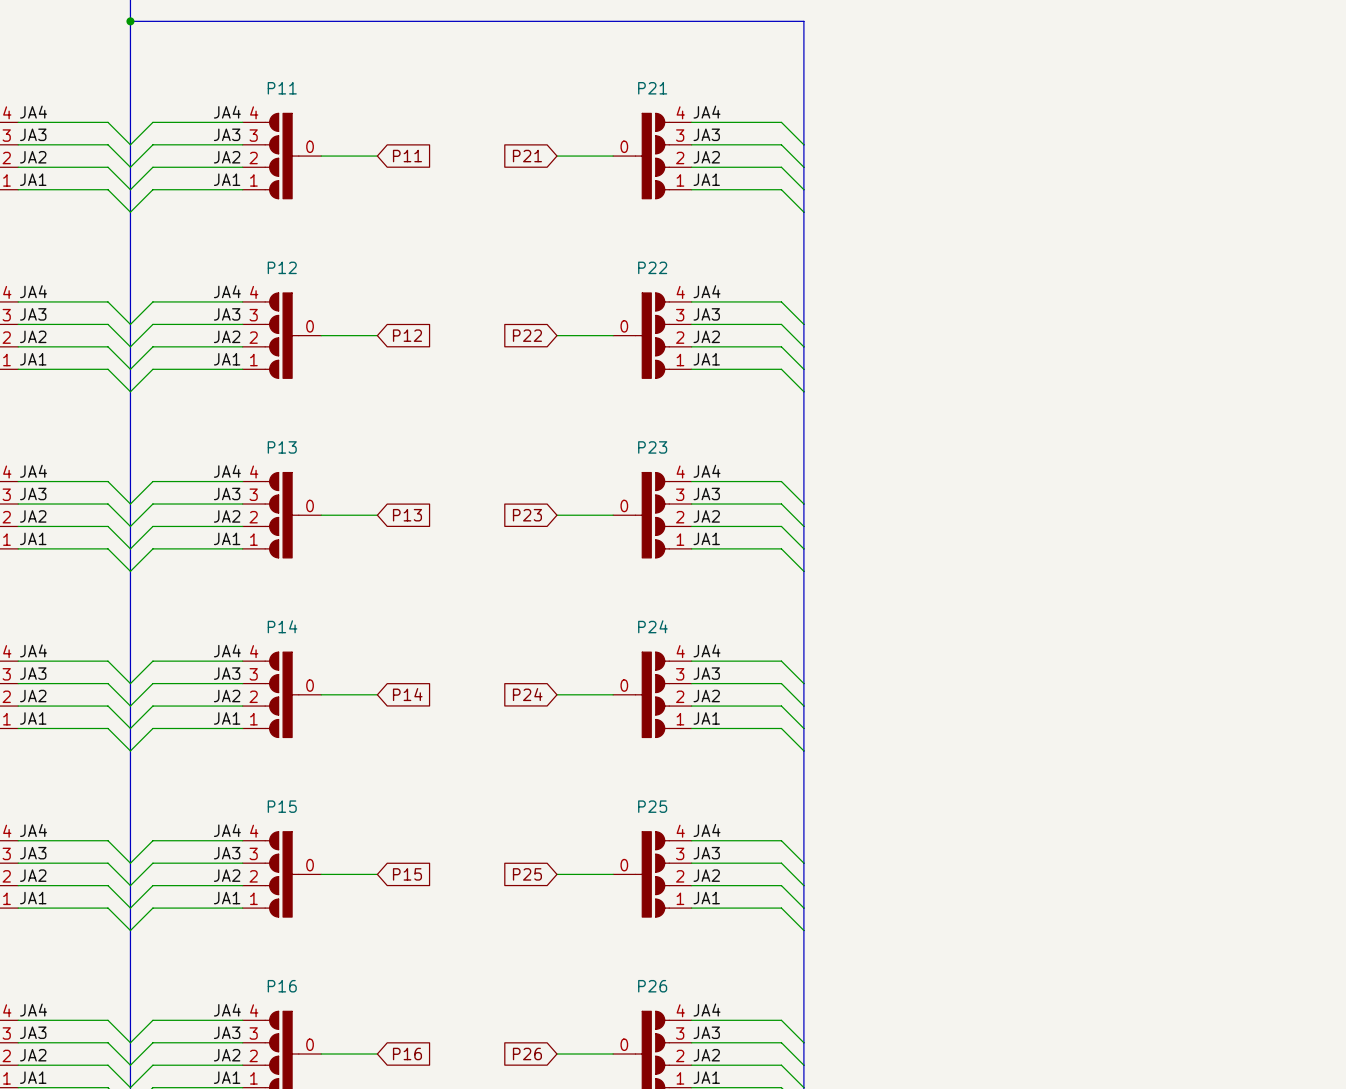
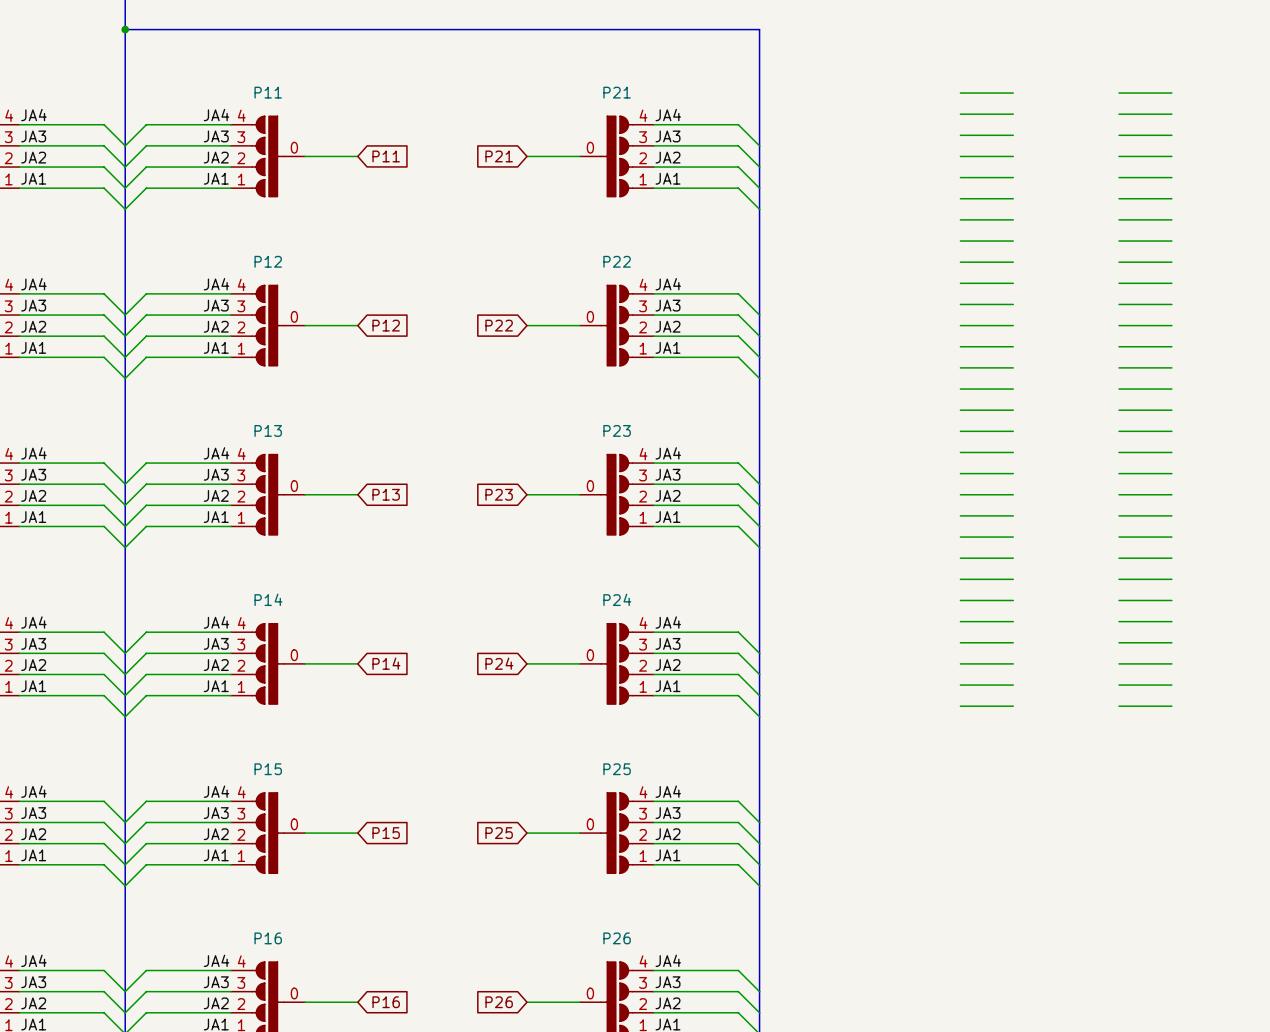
wire: none -> (960, 93) (1013, 93)
wire: none -> (1119, 93) (1171, 93)
wire: none -> (960, 114) (1013, 114)
wire: none -> (1119, 114) (1171, 114)
wire: none -> (960, 135) (1013, 135)
wire: none -> (1119, 135) (1171, 135)
wire: none -> (960, 156) (1013, 156)
wire: none -> (1119, 156) (1171, 156)
wire: none -> (960, 177) (1013, 177)
wire: none -> (1119, 177) (1171, 177)
wire: none -> (960, 198) (1013, 198)
wire: none -> (1119, 198) (1171, 198)
wire: none -> (960, 219) (1013, 219)
wire: none -> (1119, 219) (1171, 219)
wire: none -> (960, 241) (1013, 241)
wire: none -> (1119, 241) (1171, 241)
wire: none -> (960, 262) (1013, 262)
wire: none -> (1119, 262) (1171, 262)
wire: none -> (960, 283) (1013, 283)
wire: none -> (1119, 283) (1171, 283)
wire: none -> (960, 304) (1013, 304)
wire: none -> (1119, 304) (1171, 304)
wire: none -> (960, 325) (1013, 325)
wire: none -> (1119, 325) (1171, 325)
wire: none -> (960, 346) (1013, 346)
wire: none -> (1119, 346) (1171, 346)
wire: none -> (960, 367) (1013, 367)
wire: none -> (1119, 367) (1171, 367)
wire: none -> (960, 389) (1013, 389)
wire: none -> (1119, 389) (1171, 389)
wire: none -> (960, 410) (1013, 410)
wire: none -> (1119, 410) (1171, 410)
wire: none -> (960, 431) (1013, 431)
wire: none -> (1119, 431) (1171, 431)
wire: none -> (960, 452) (1013, 452)
wire: none -> (1119, 452) (1171, 452)
wire: none -> (960, 473) (1013, 473)
wire: none -> (1119, 473) (1171, 473)
wire: none -> (960, 494) (1013, 494)
wire: none -> (1119, 494) (1171, 494)
wire: none -> (960, 515) (1013, 515)
wire: none -> (1119, 515) (1171, 515)
wire: none -> (960, 537) (1013, 537)
wire: none -> (1119, 537) (1171, 537)
wire: none -> (960, 558) (1013, 558)
wire: none -> (1119, 558) (1171, 558)
wire: none -> (960, 579) (1013, 579)
wire: none -> (1119, 579) (1171, 579)
wire: none -> (960, 600) (1013, 600)
wire: none -> (1119, 600) (1171, 600)
wire: none -> (960, 621) (1013, 621)
wire: none -> (1119, 621) (1171, 621)
wire: none -> (960, 642) (1013, 642)
wire: none -> (1119, 642) (1171, 642)
wire: none -> (960, 663) (1013, 663)
wire: none -> (1119, 663) (1171, 663)
wire: none -> (960, 685) (1013, 685)
wire: none -> (1119, 685) (1171, 685)
wire: none -> (960, 706) (1013, 706)
wire: none -> (1119, 706) (1171, 706)

